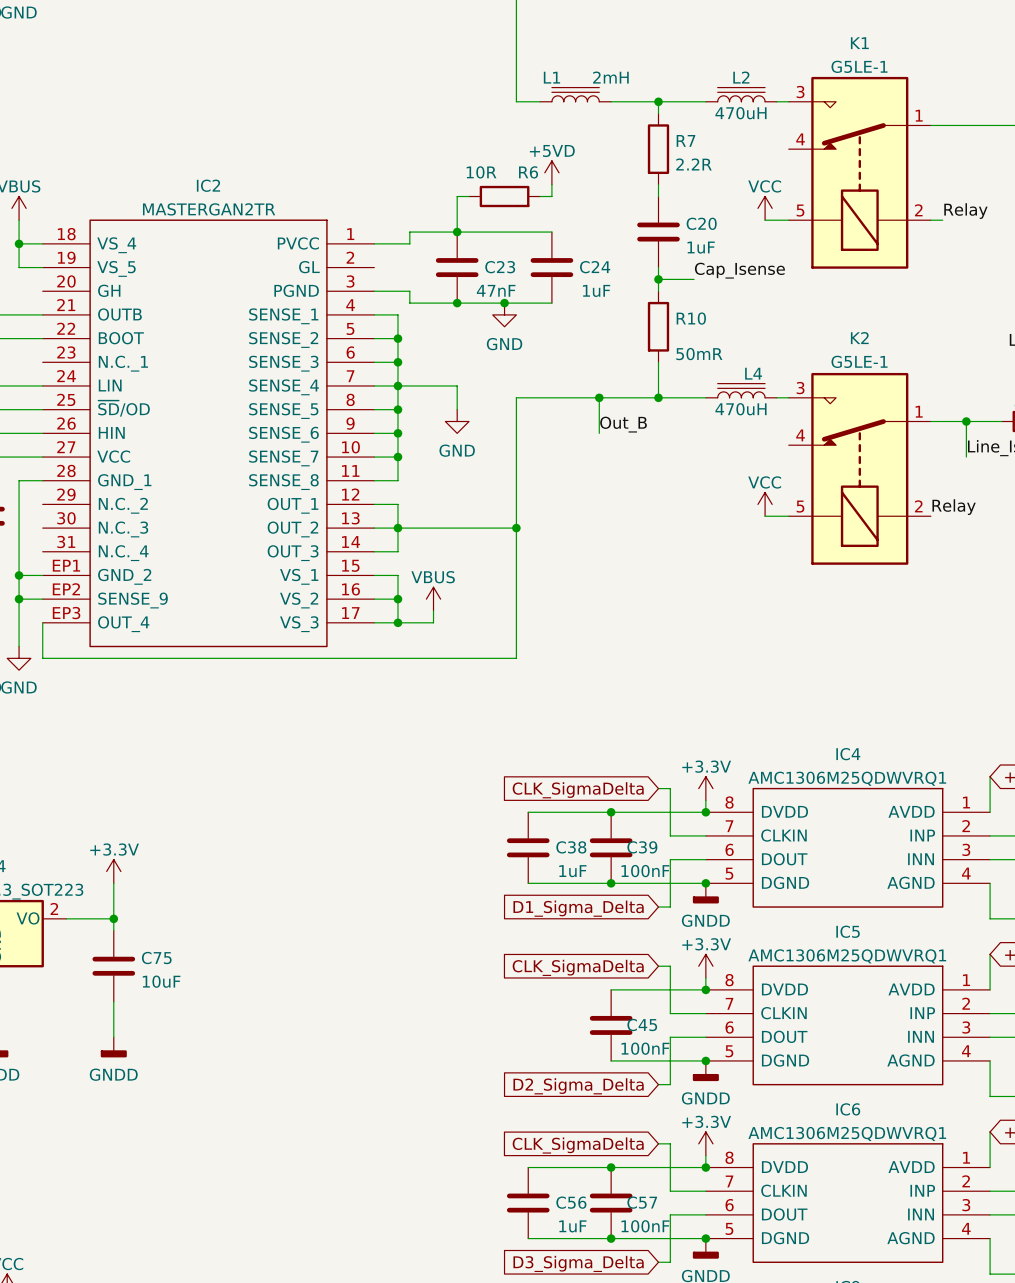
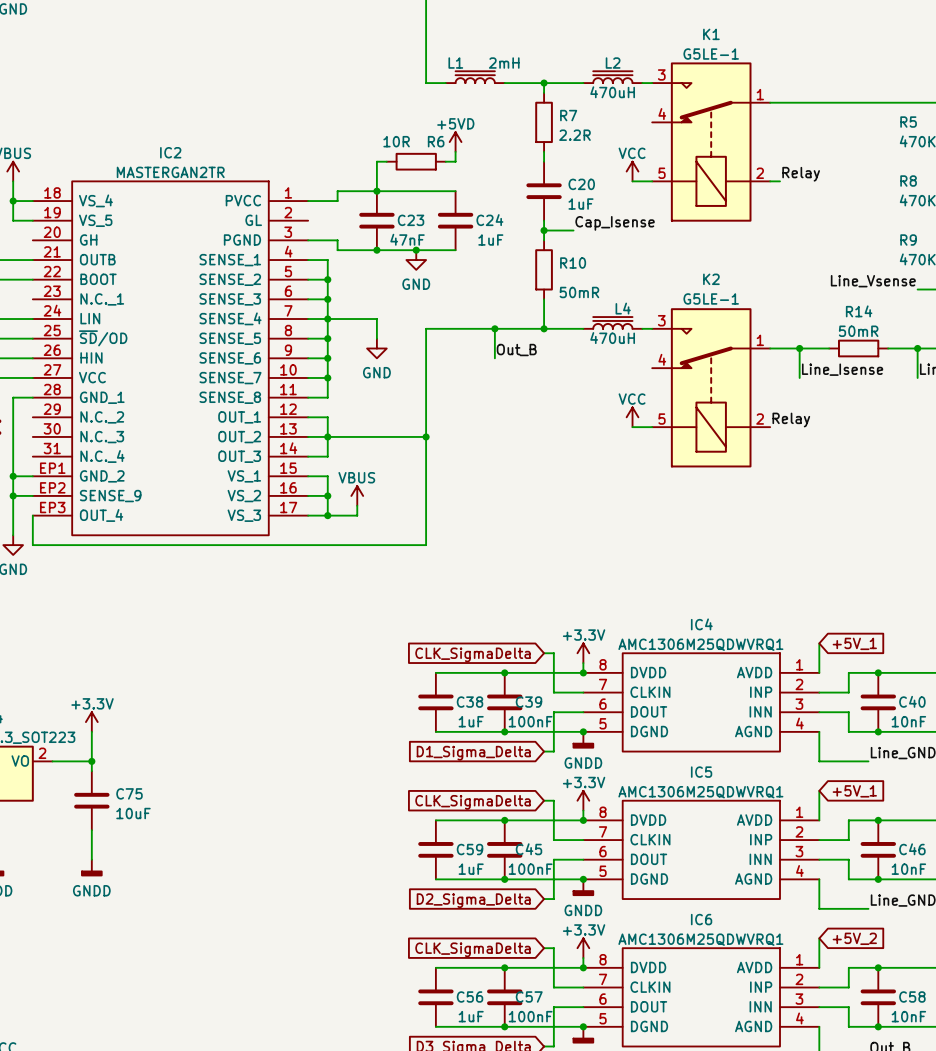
wire: none -> (435, 820) (504, 820)
junction: none -> (504, 820)
C59: none -> 1uF (435, 849)
wire: none -> (435, 879) (504, 879)
junction: none -> (504, 879)

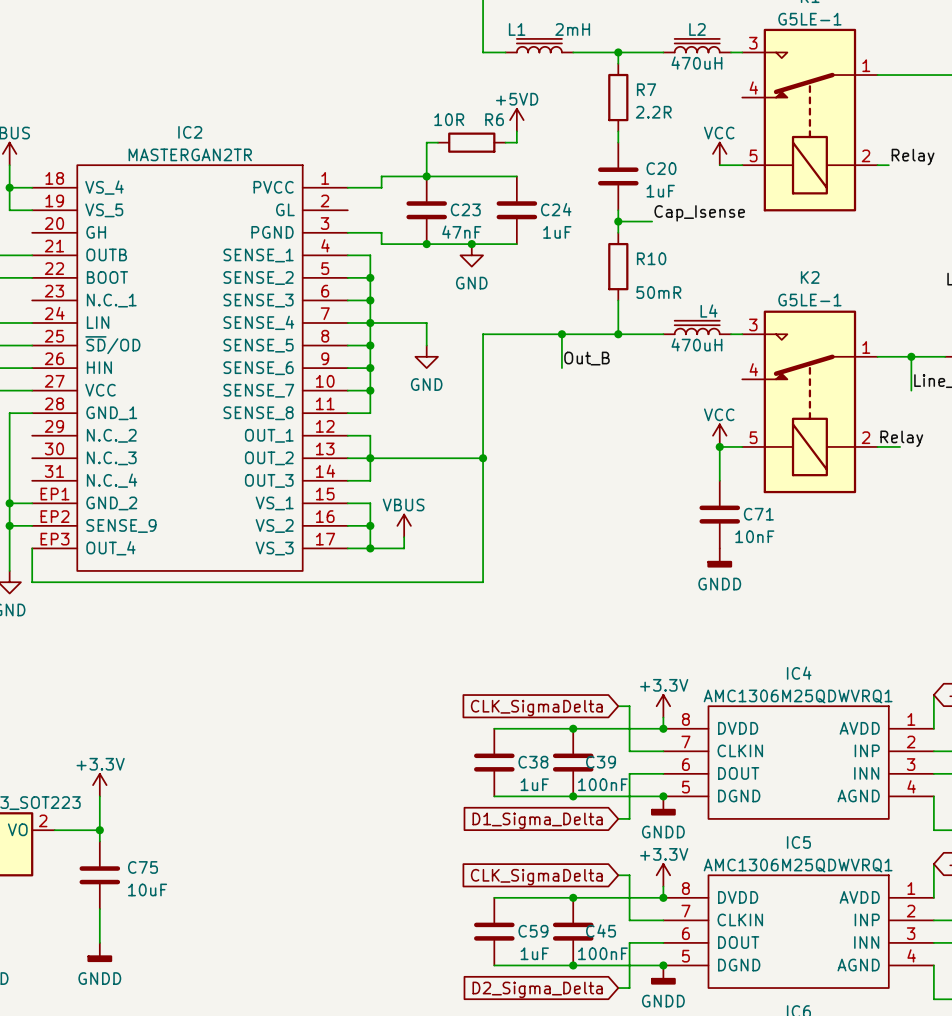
wire: none -> (719, 446) (719, 480)
junction: none -> (719, 446)
wire: none -> (877, 446) (900, 446)
C71: none -> 10nF (719, 514)
power symbol: none -> GNDD (719, 558)

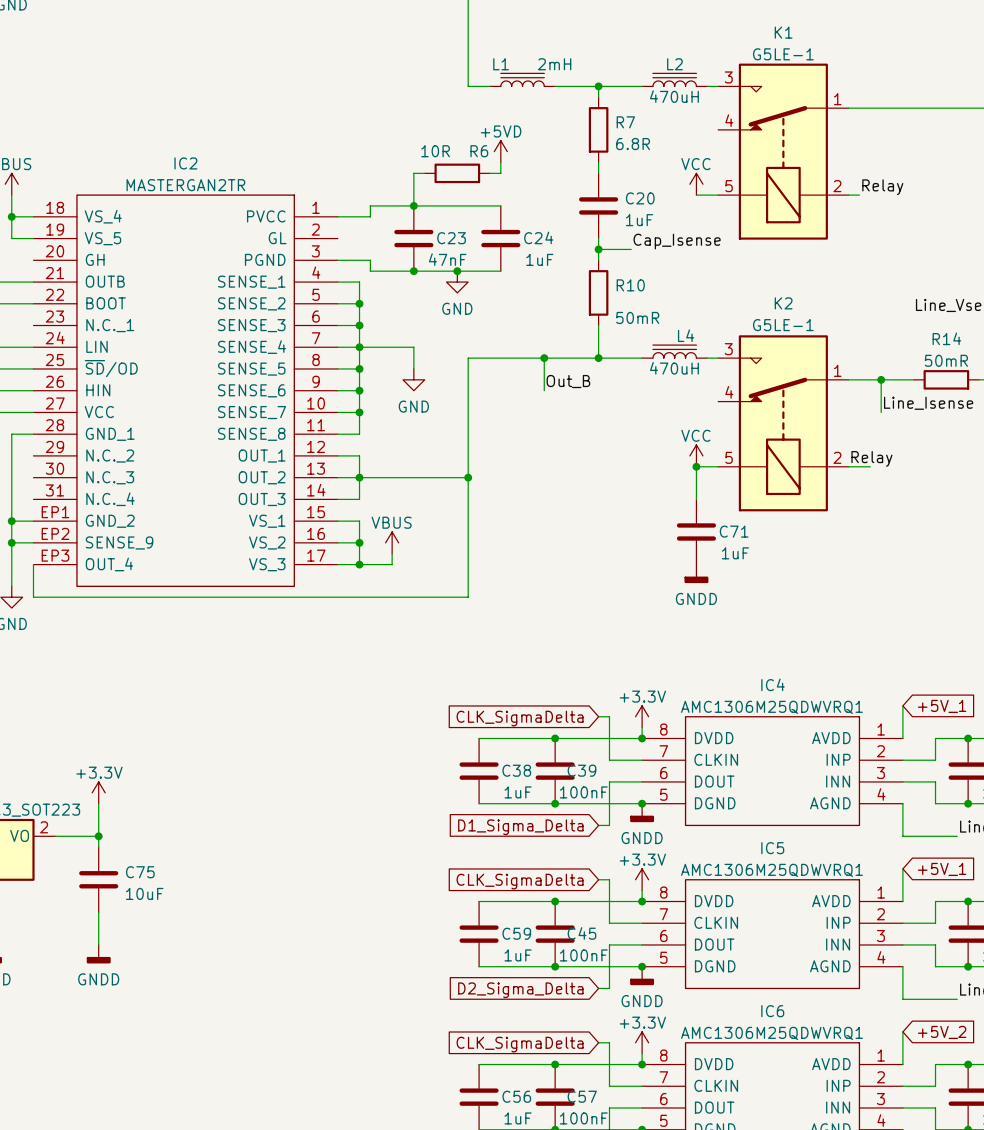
R7 value: 2.2R (653, 112) -> 6.8R (633, 144)
C71 value: 10nF (754, 536) -> 1uF (735, 553)

